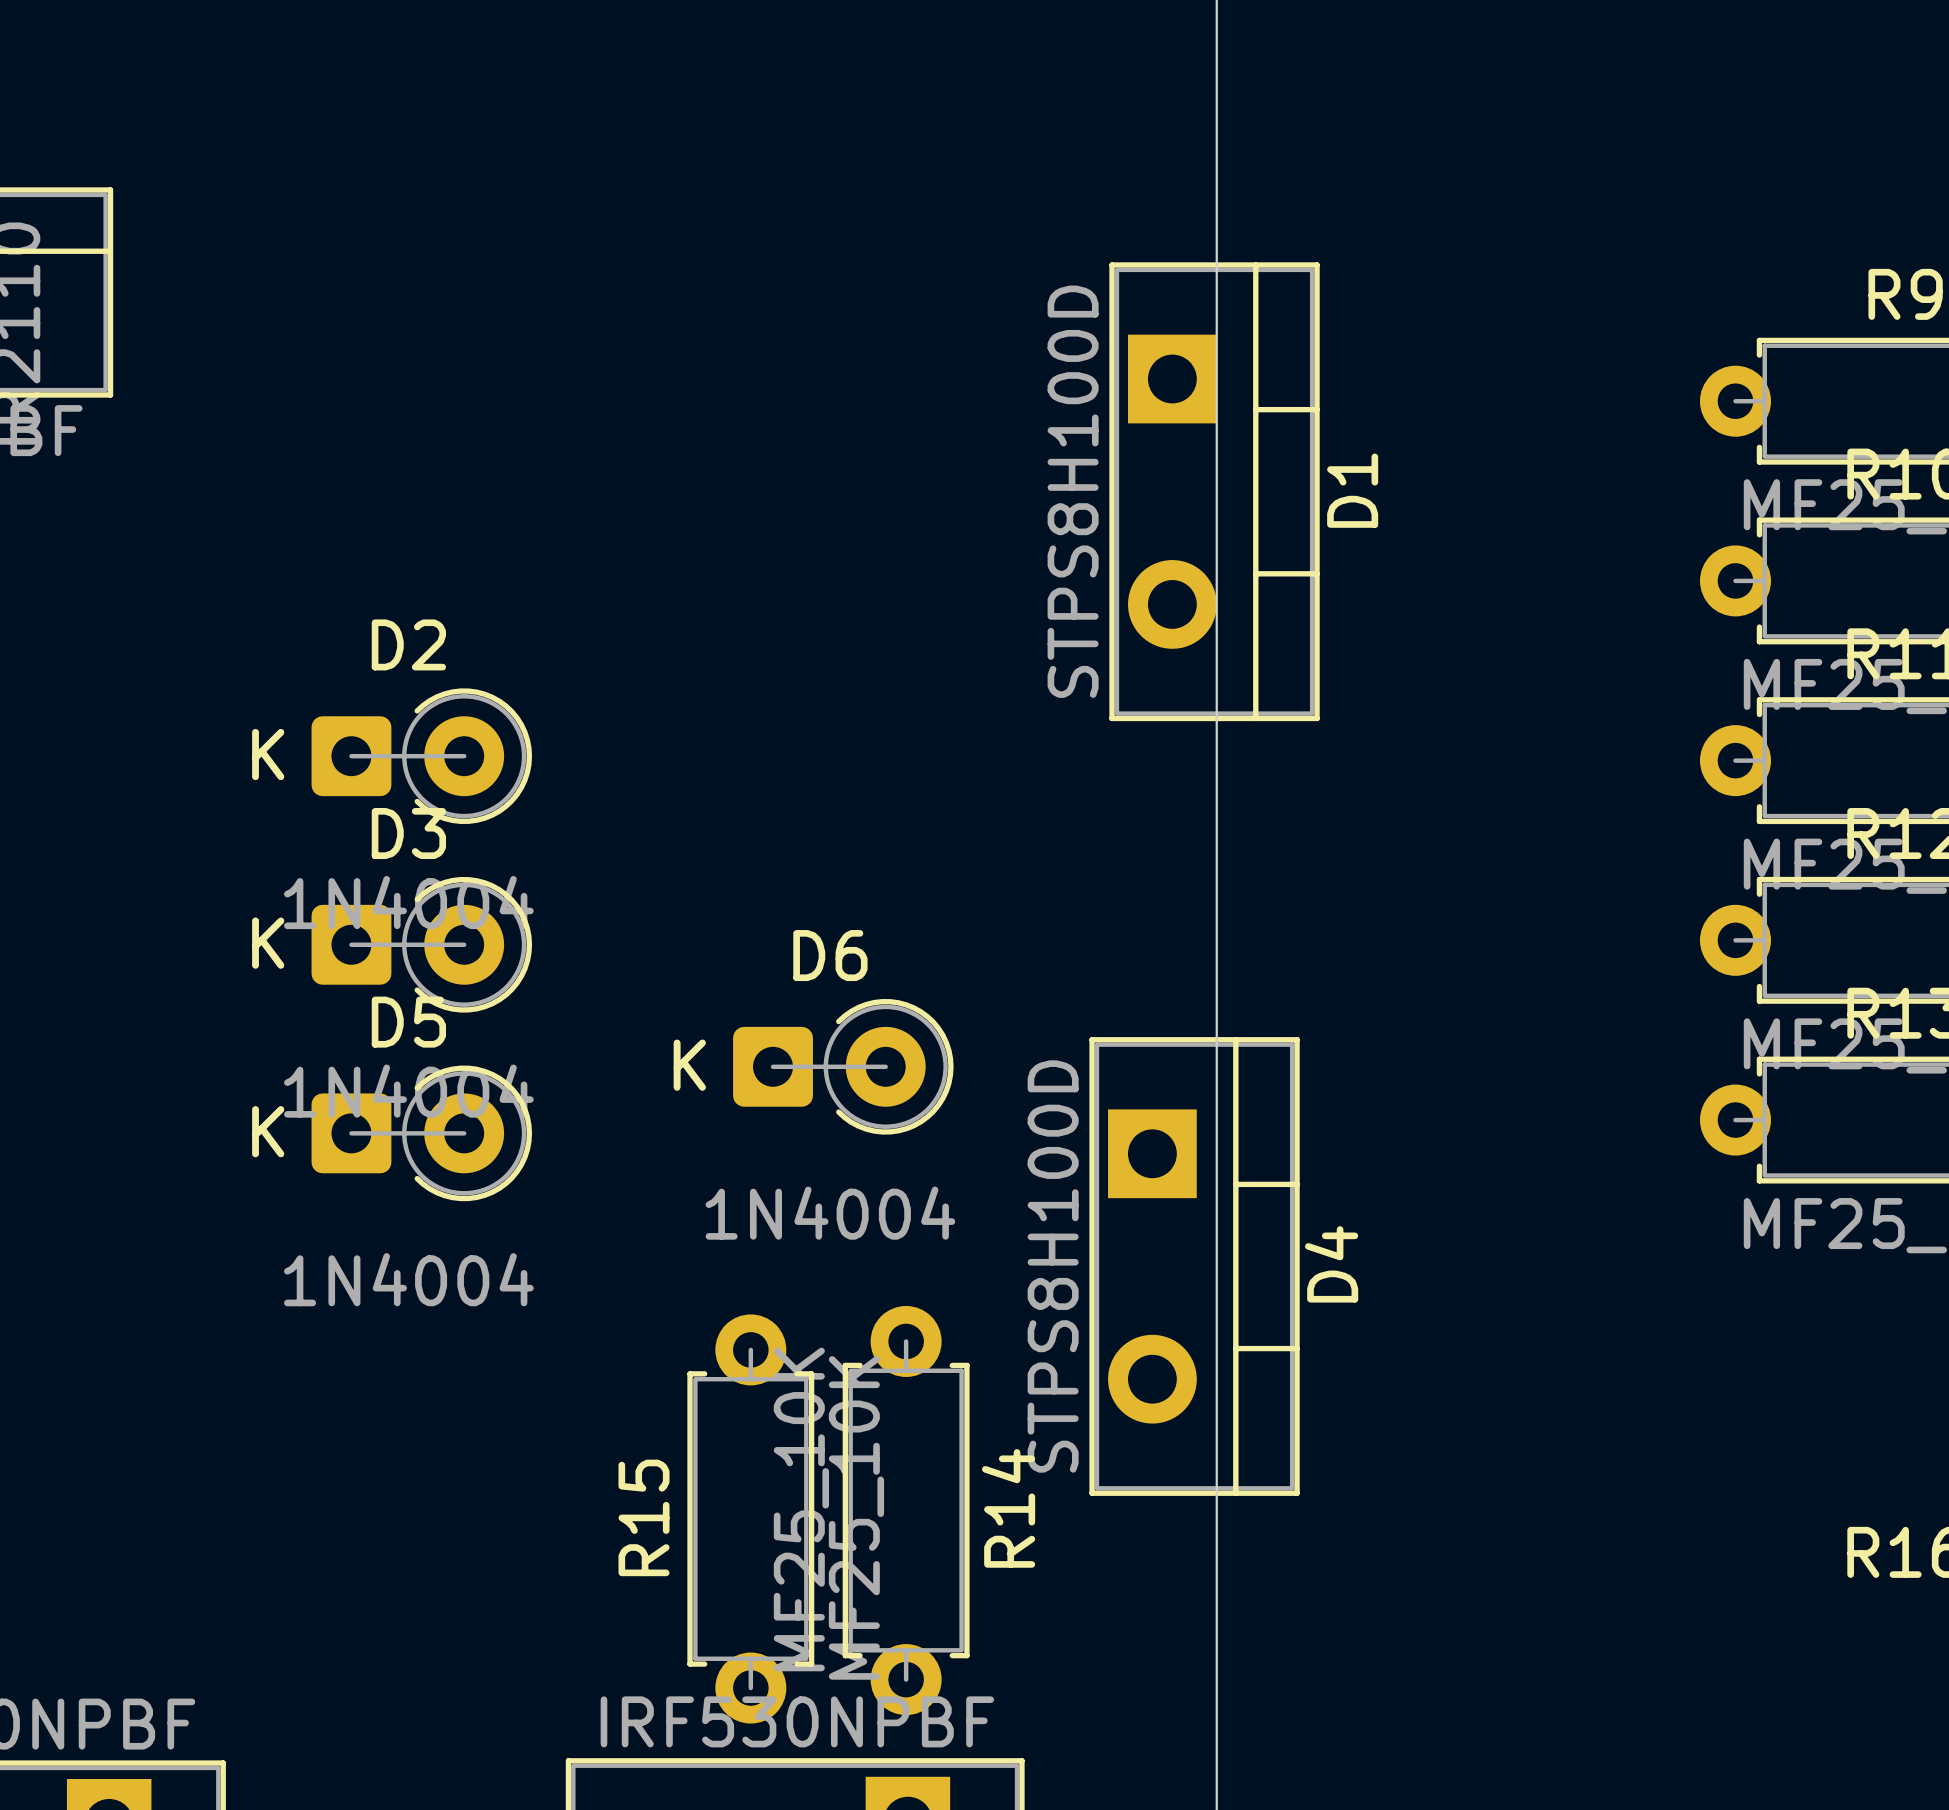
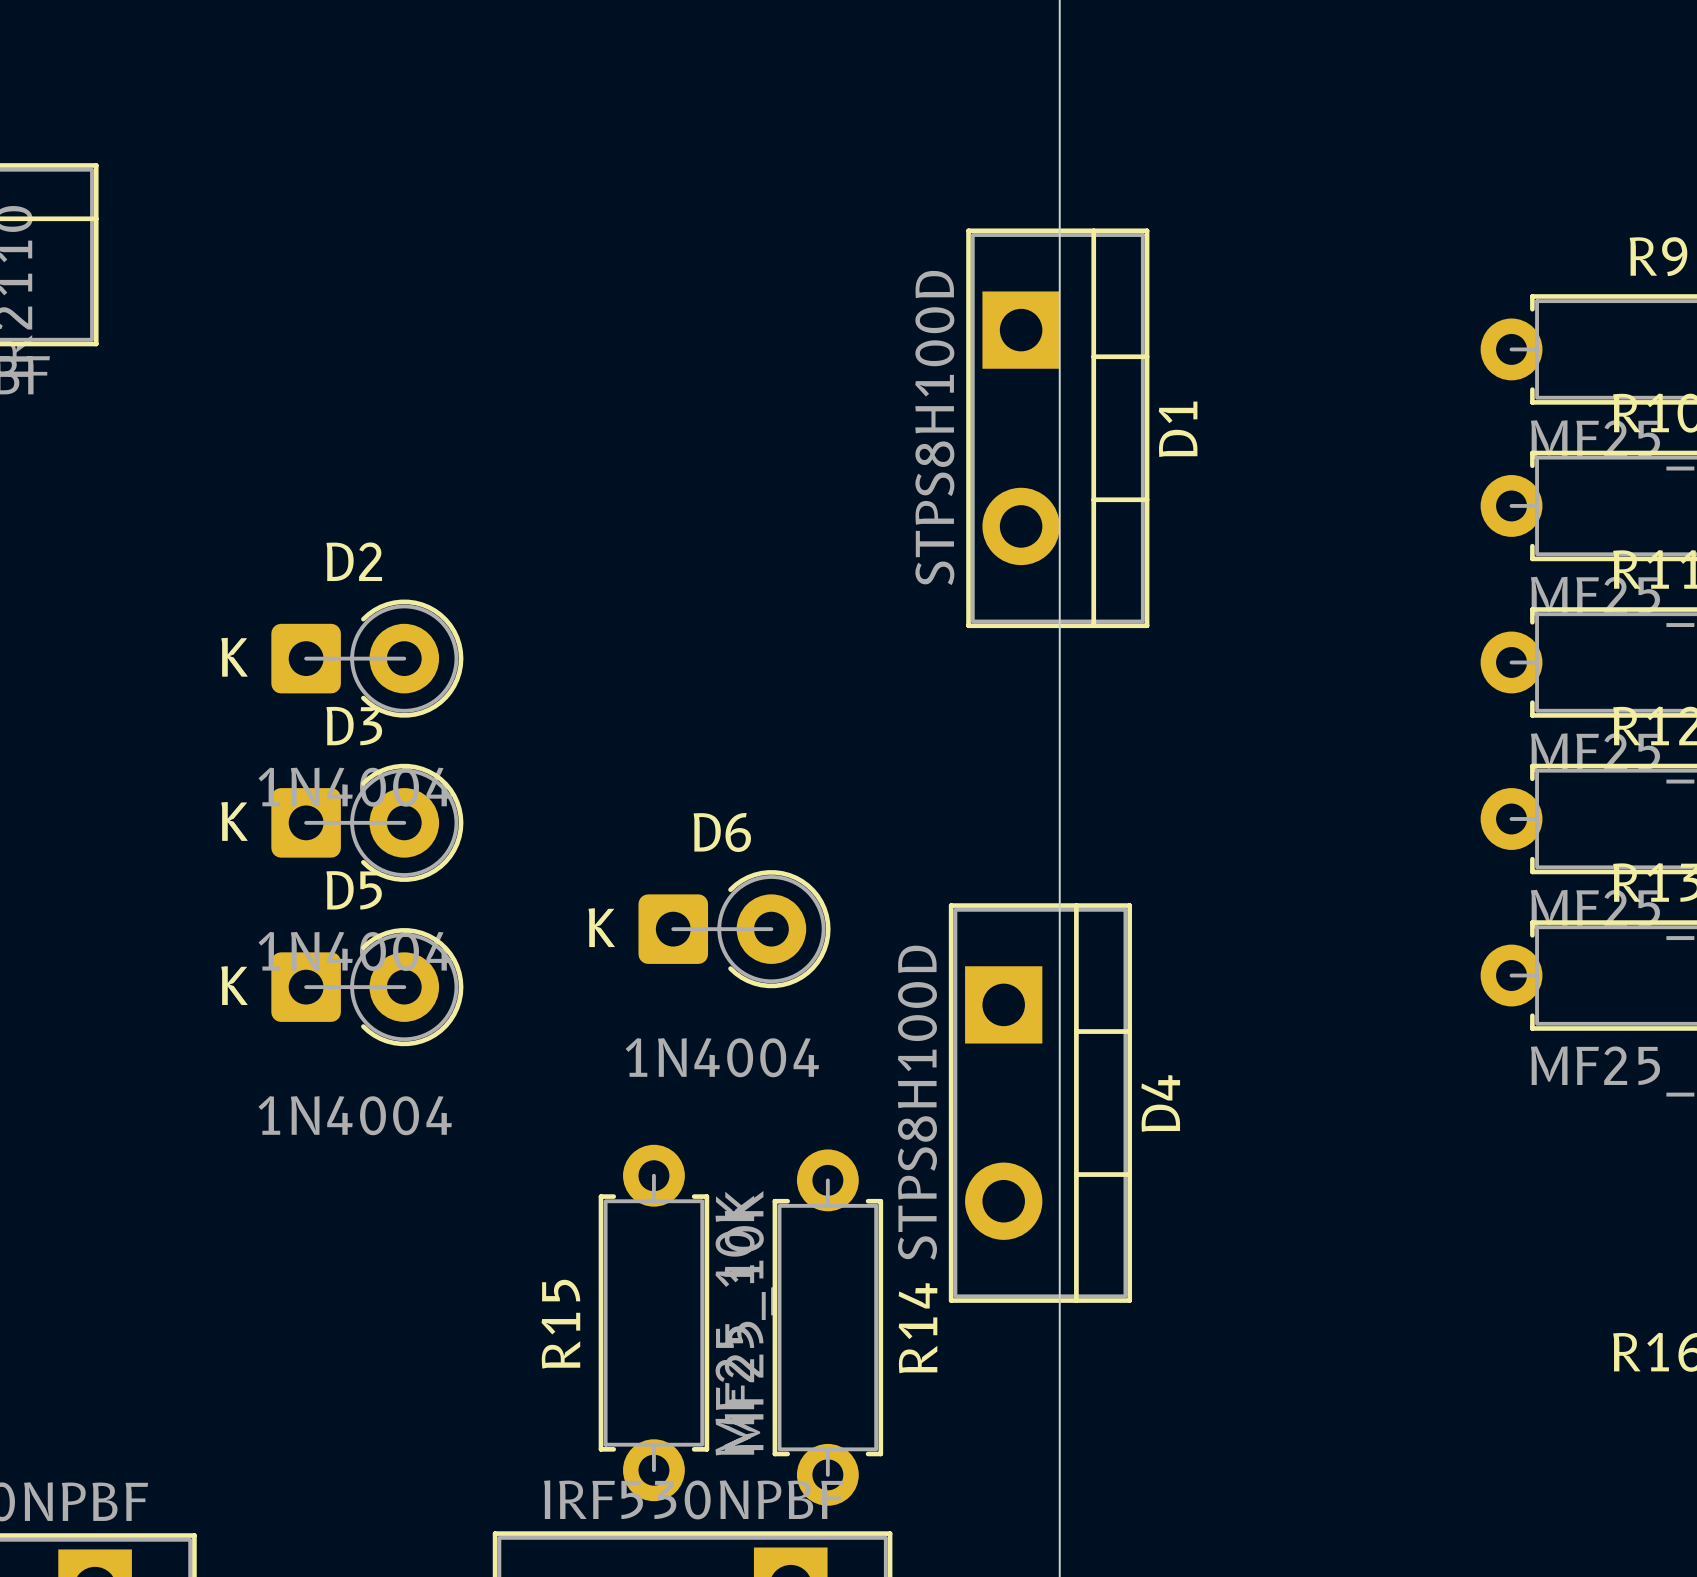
R14 position: (906, 1510) -> (827, 1327)

